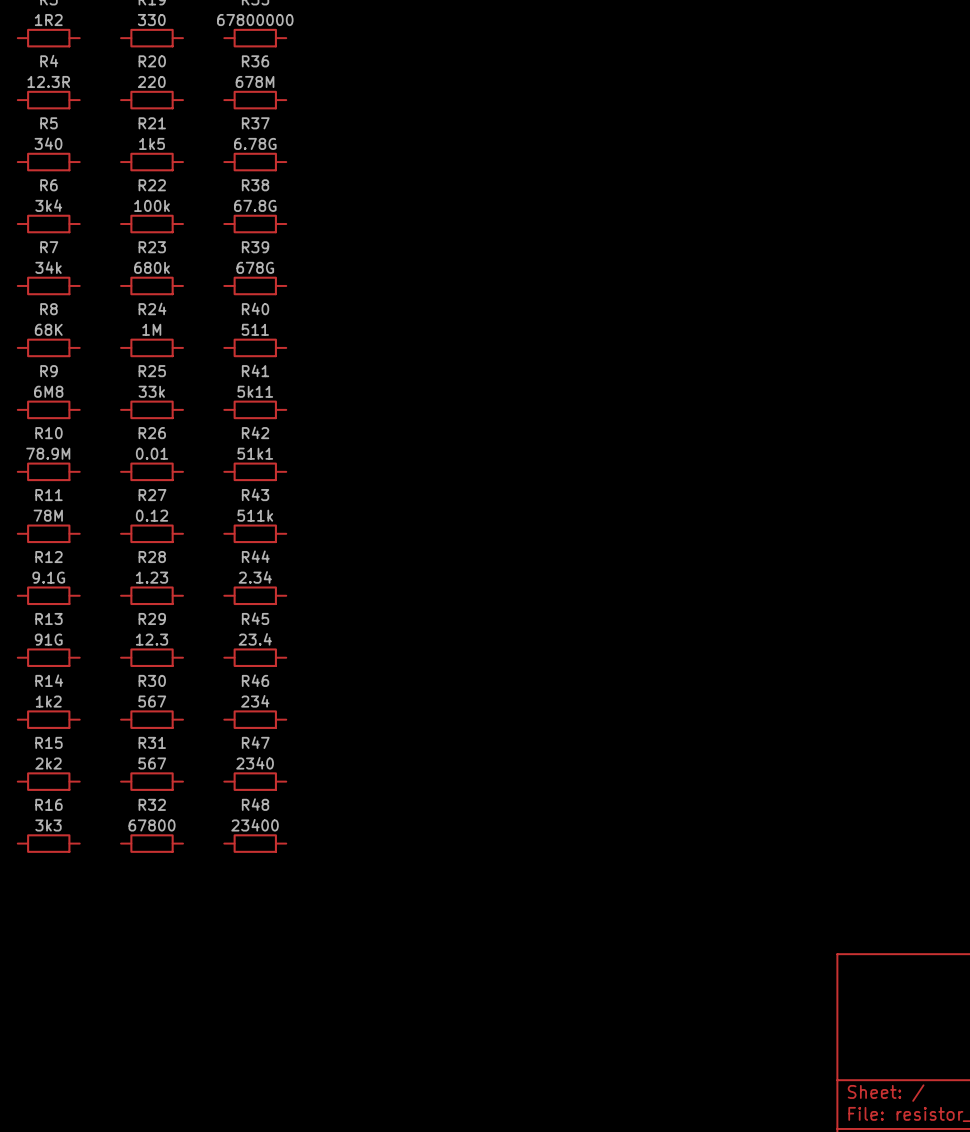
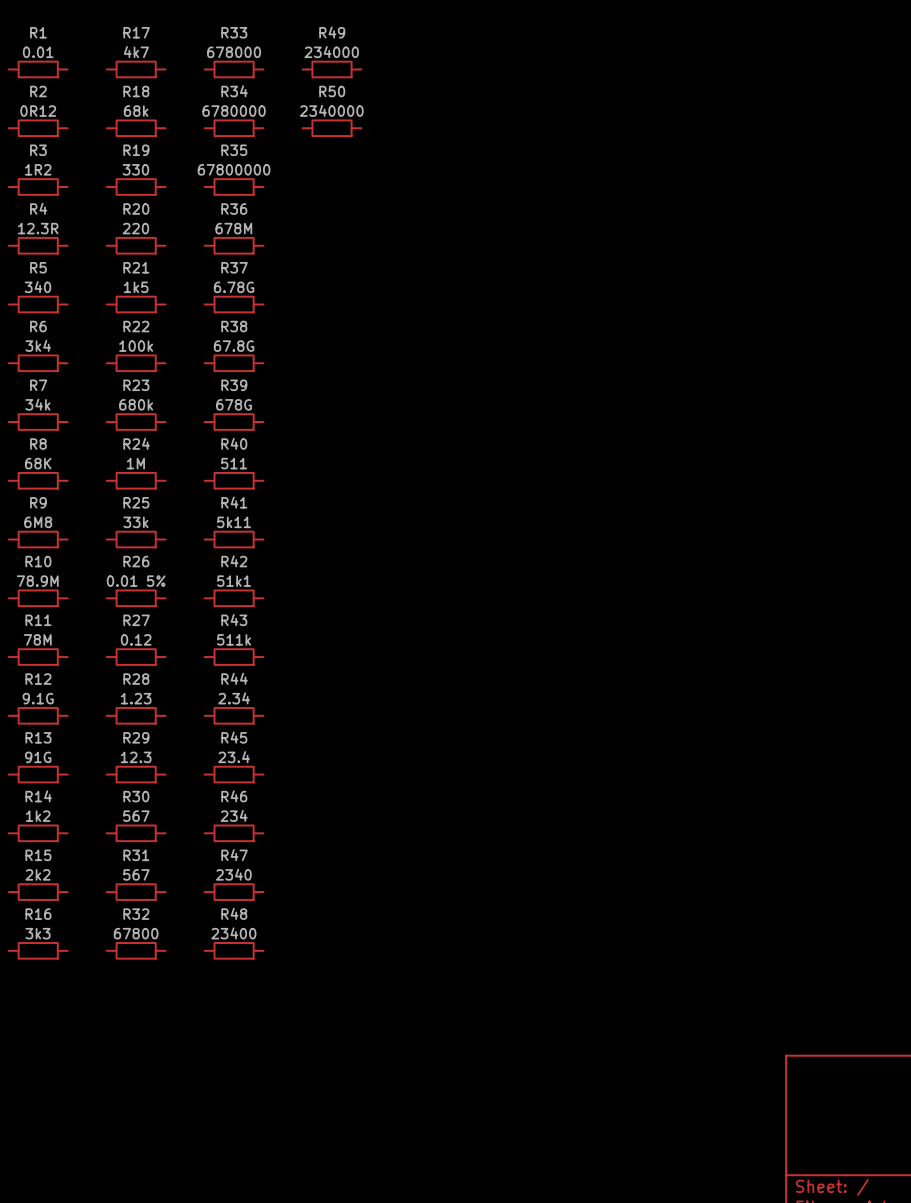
R26 value: 0.01 (152, 453) -> 0.01 5% (136, 581)

